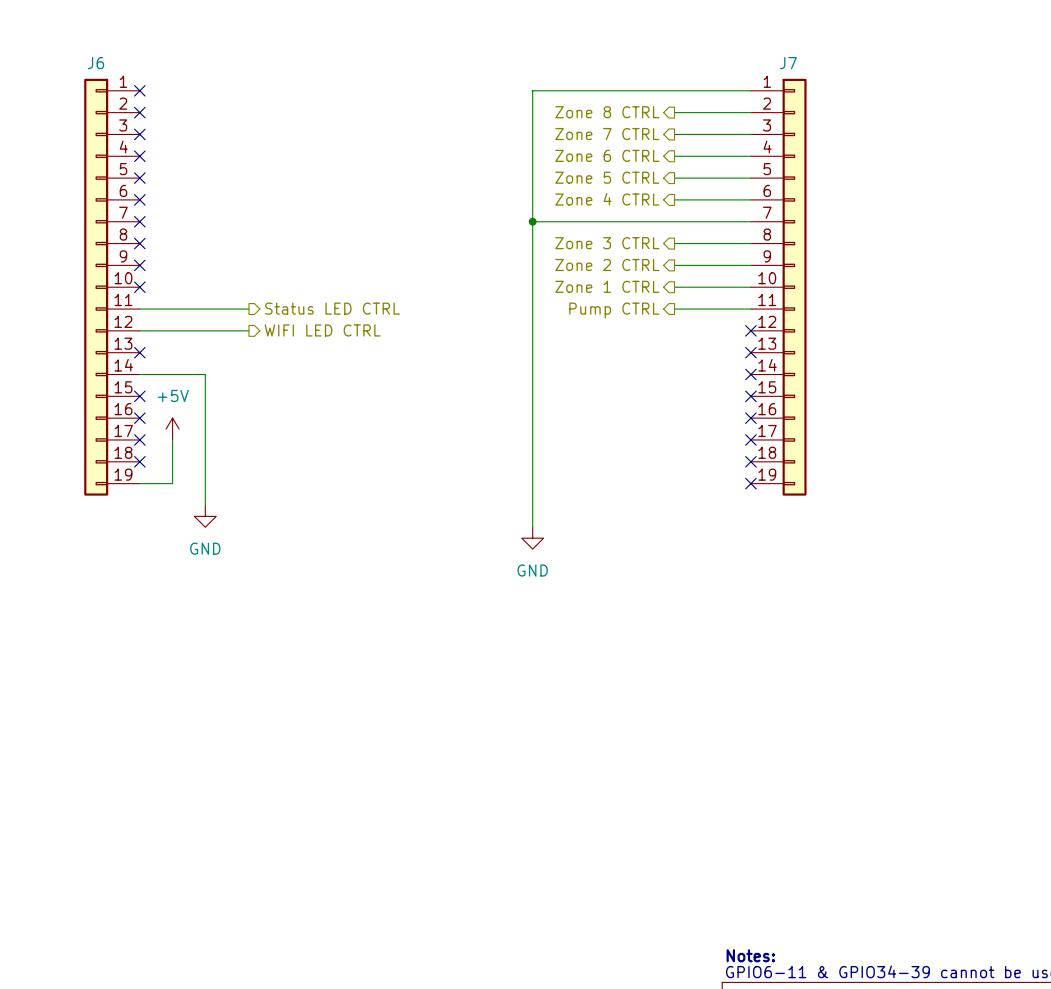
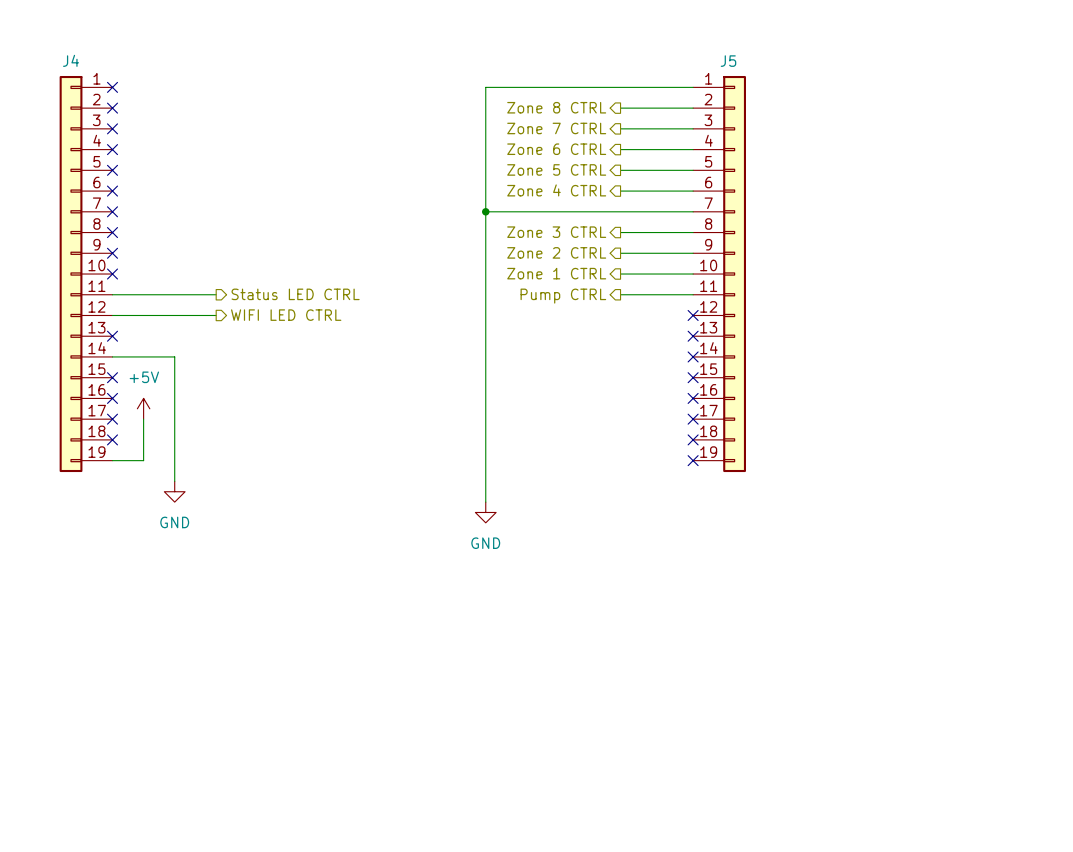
J6 name: J6 (95, 63) -> J4 (71, 60)
J7 name: J7 (788, 63) -> J5 (728, 61)

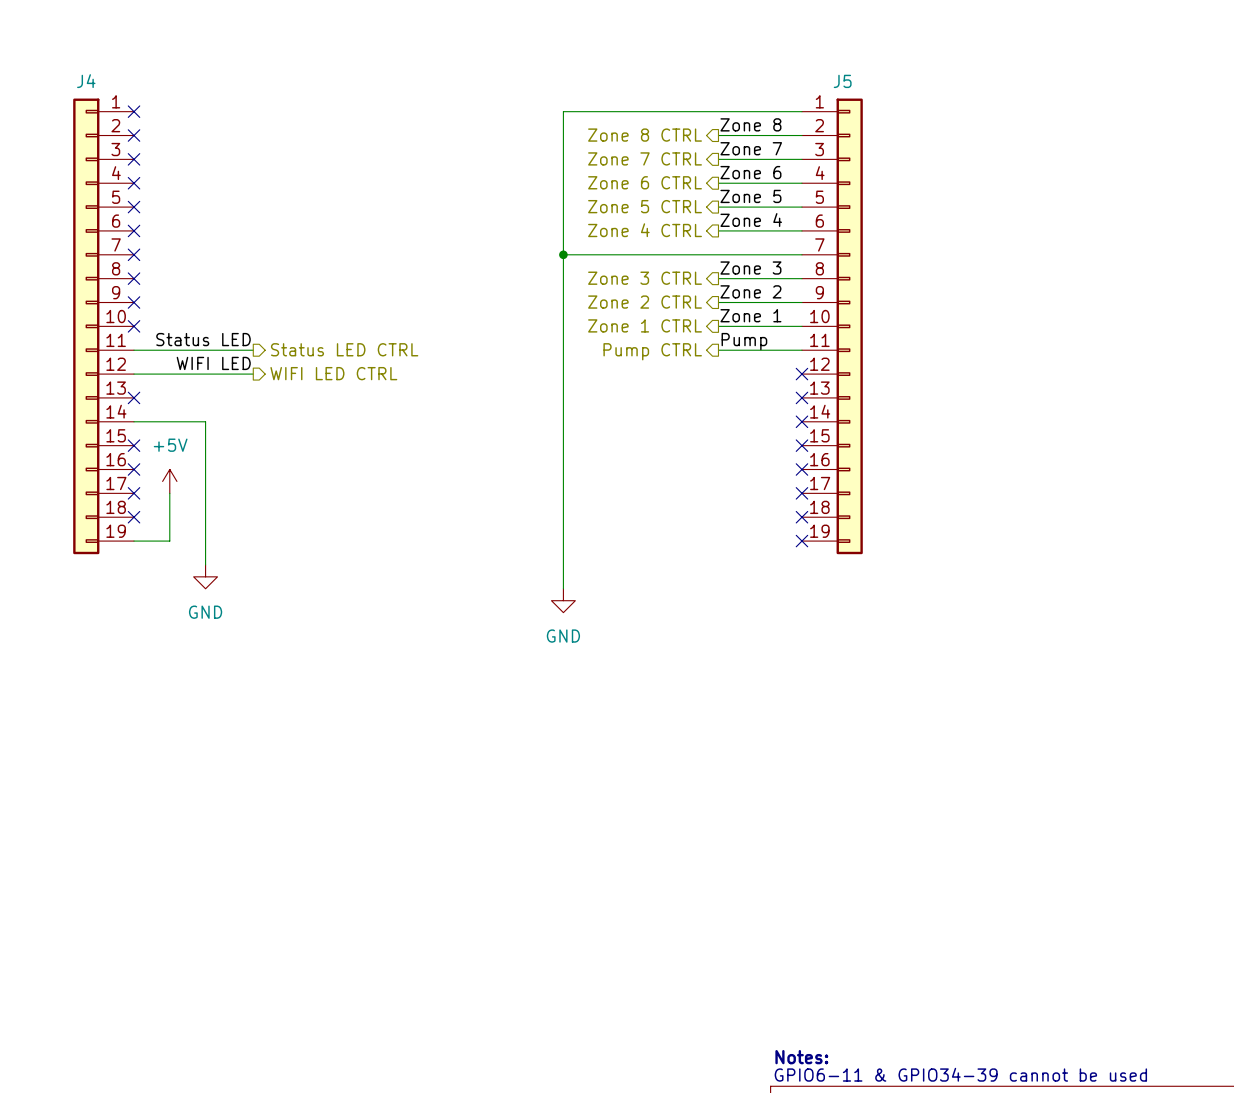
label: none -> Zone 8 (750, 124)
label: none -> Zone 7 (751, 148)
label: none -> Zone 6 (750, 172)
label: none -> Zone 5 (750, 196)
label: none -> Zone 4 (751, 220)
label: none -> Zone 3 (750, 268)
label: none -> Zone 2 (750, 291)
label: none -> Zone 1 (750, 315)
label: none -> Status LED (203, 339)
label: none -> Pump (744, 341)
label: none -> WIFI LED (213, 363)

